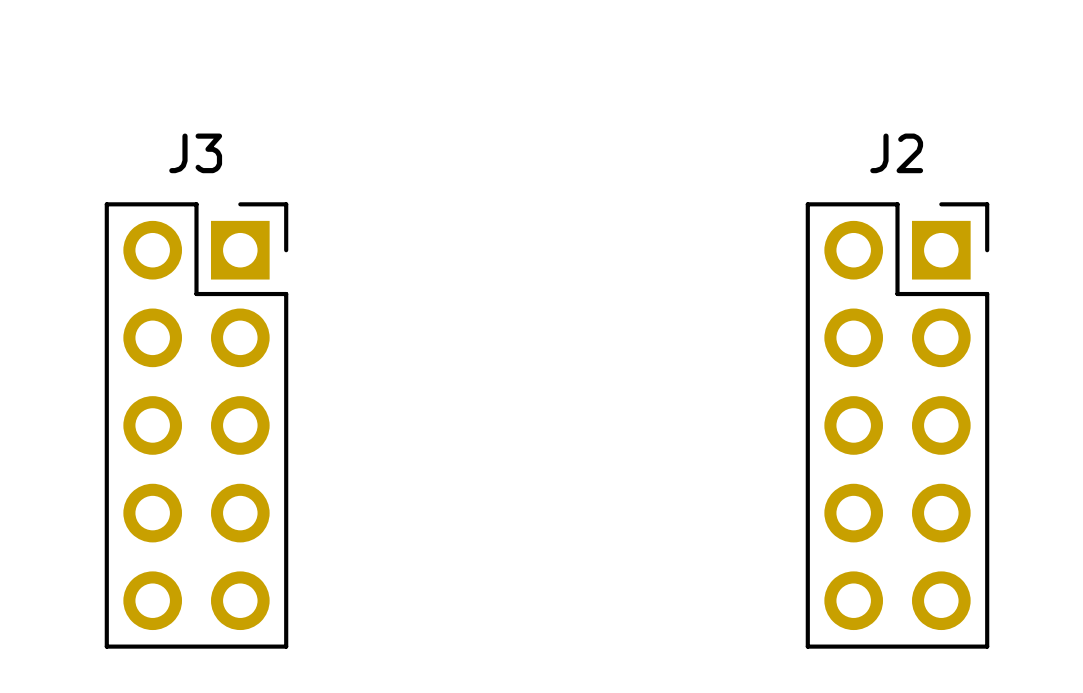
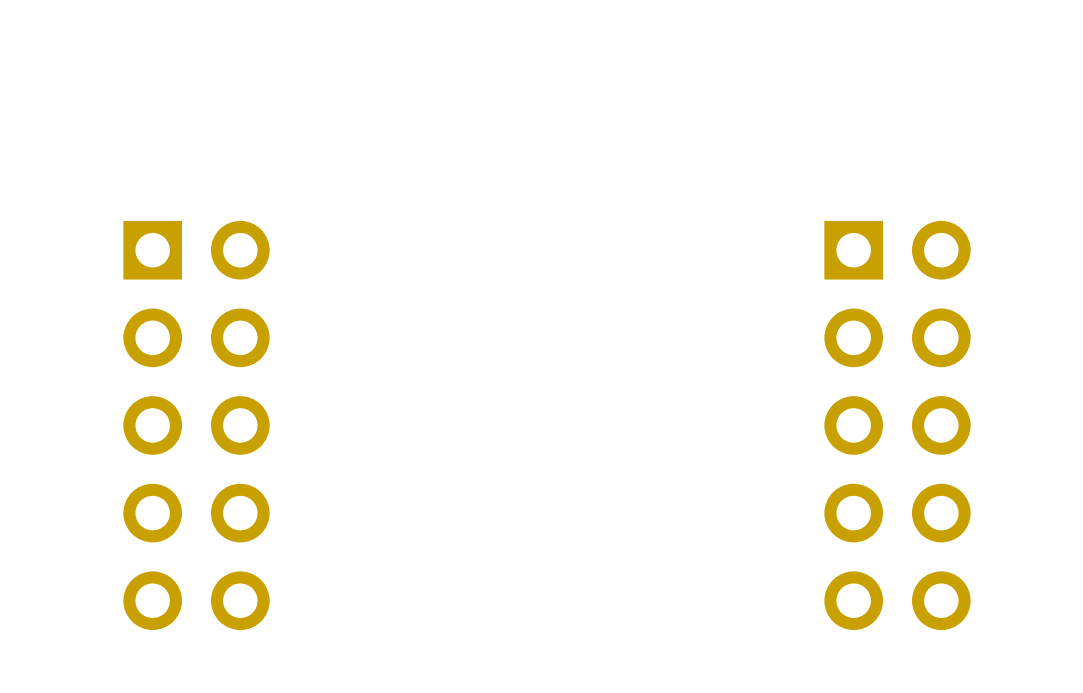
J3 side: bottom (196, 425) -> top (196, 425)
J2 side: bottom (897, 425) -> top (897, 425)

